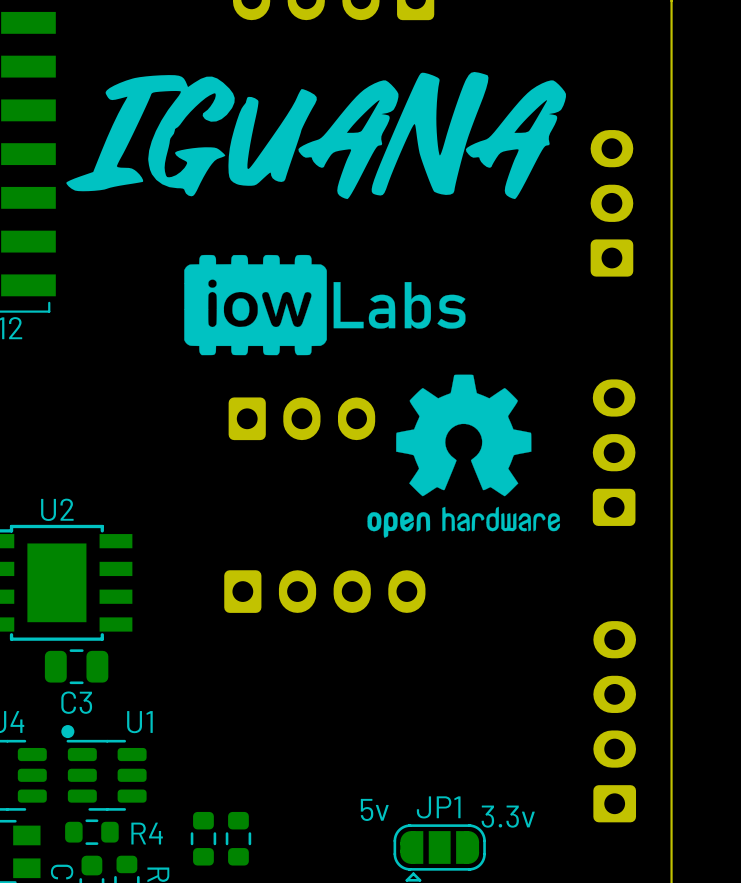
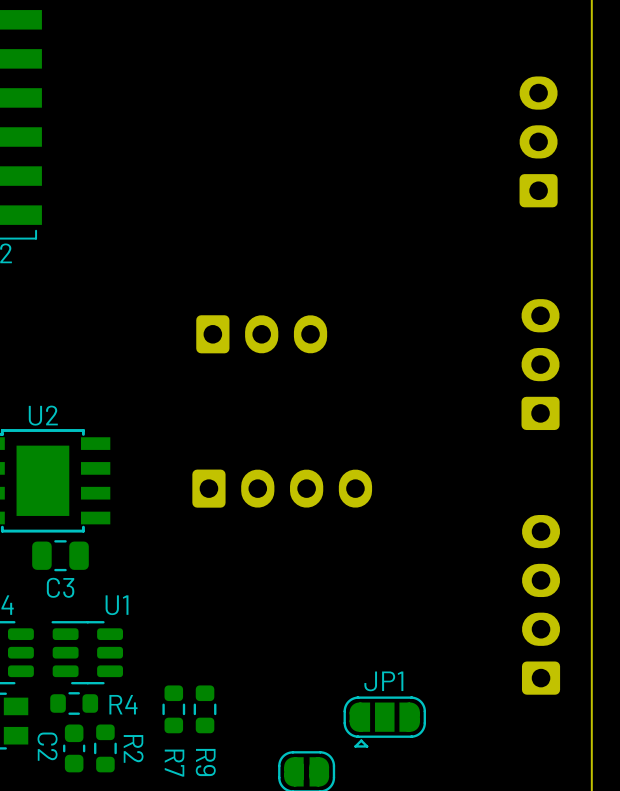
drawing: [66, 71, 566, 200] -> none
drawing: [184, 254, 561, 538] -> none
drawing: [61, 725, 75, 739] -> none
text: 5v (374, 809) -> none
text: 3.3v (508, 816) -> none

